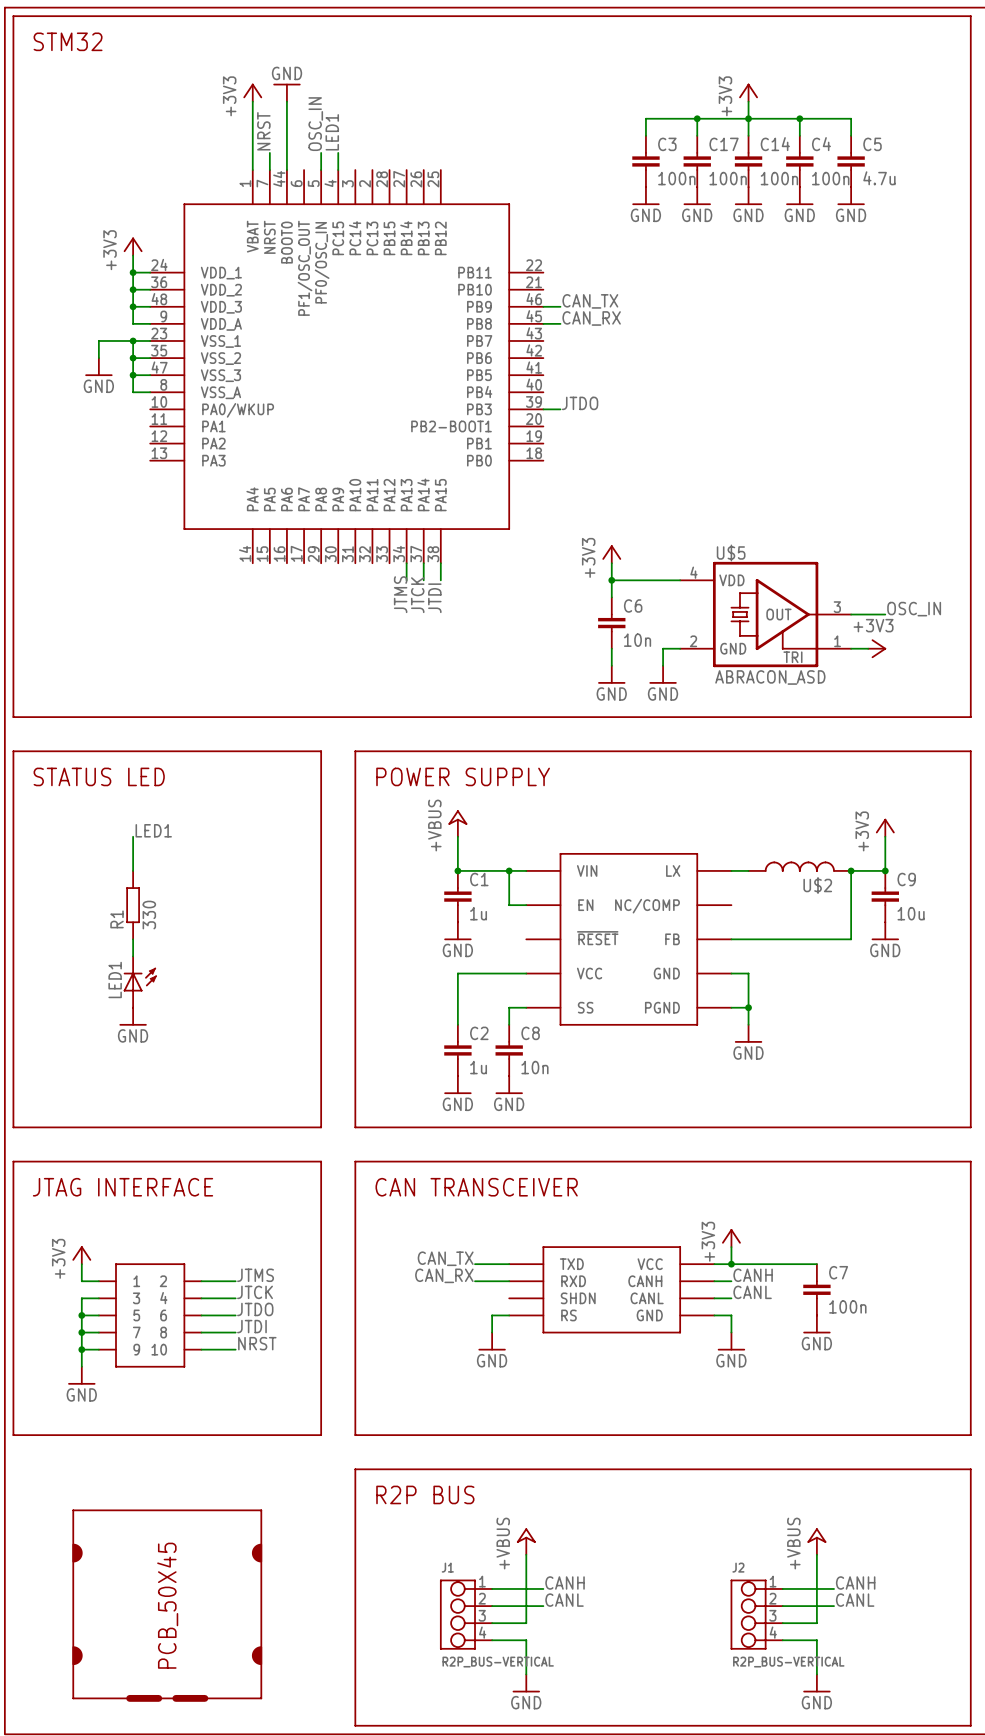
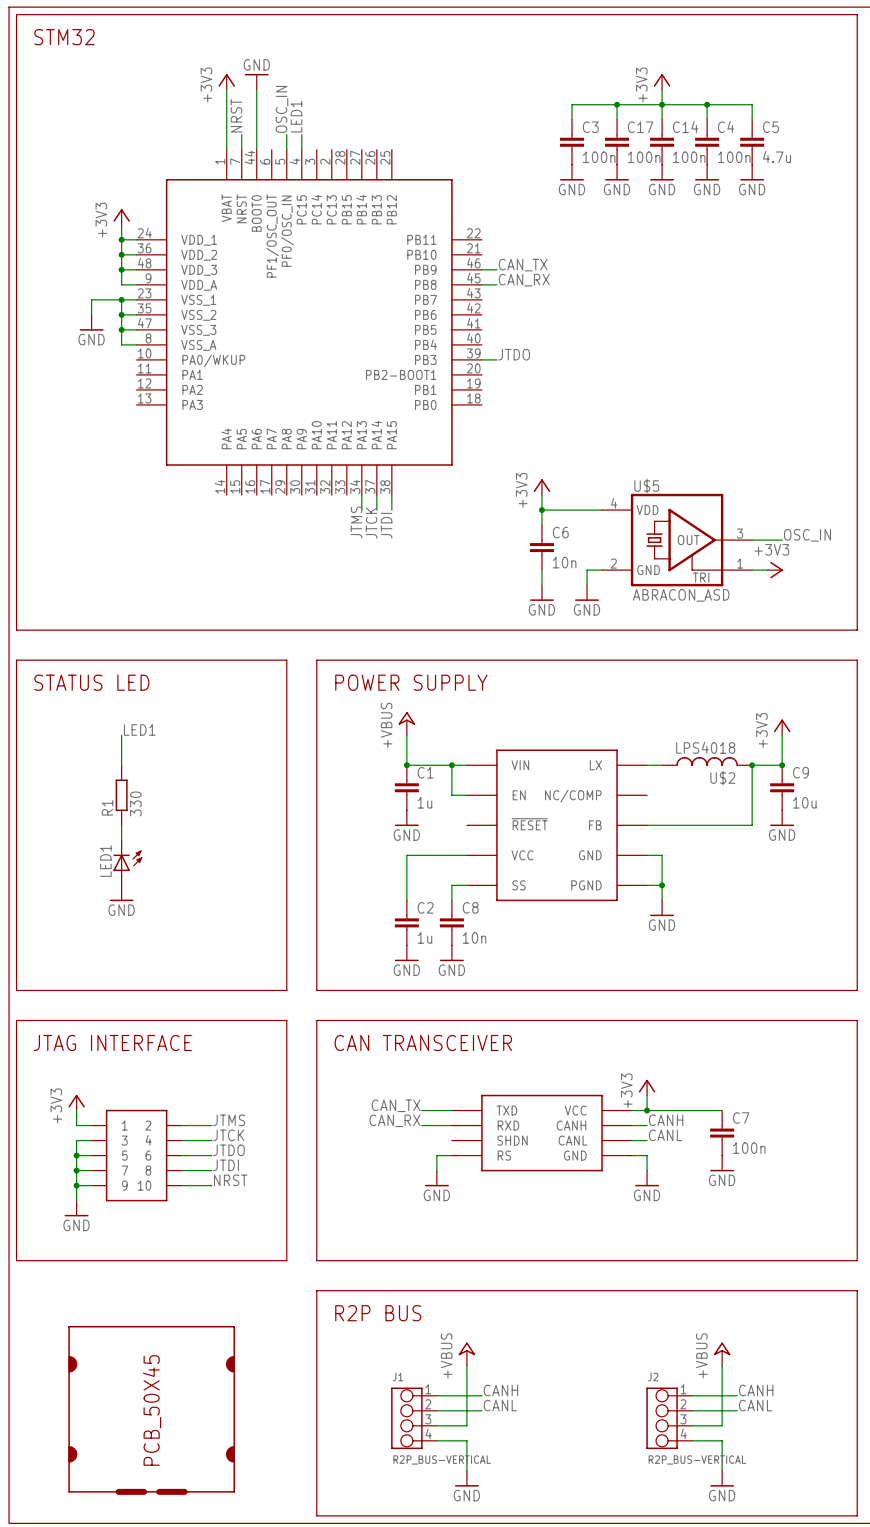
U$2 value: none -> LPS4018 (705, 747)

